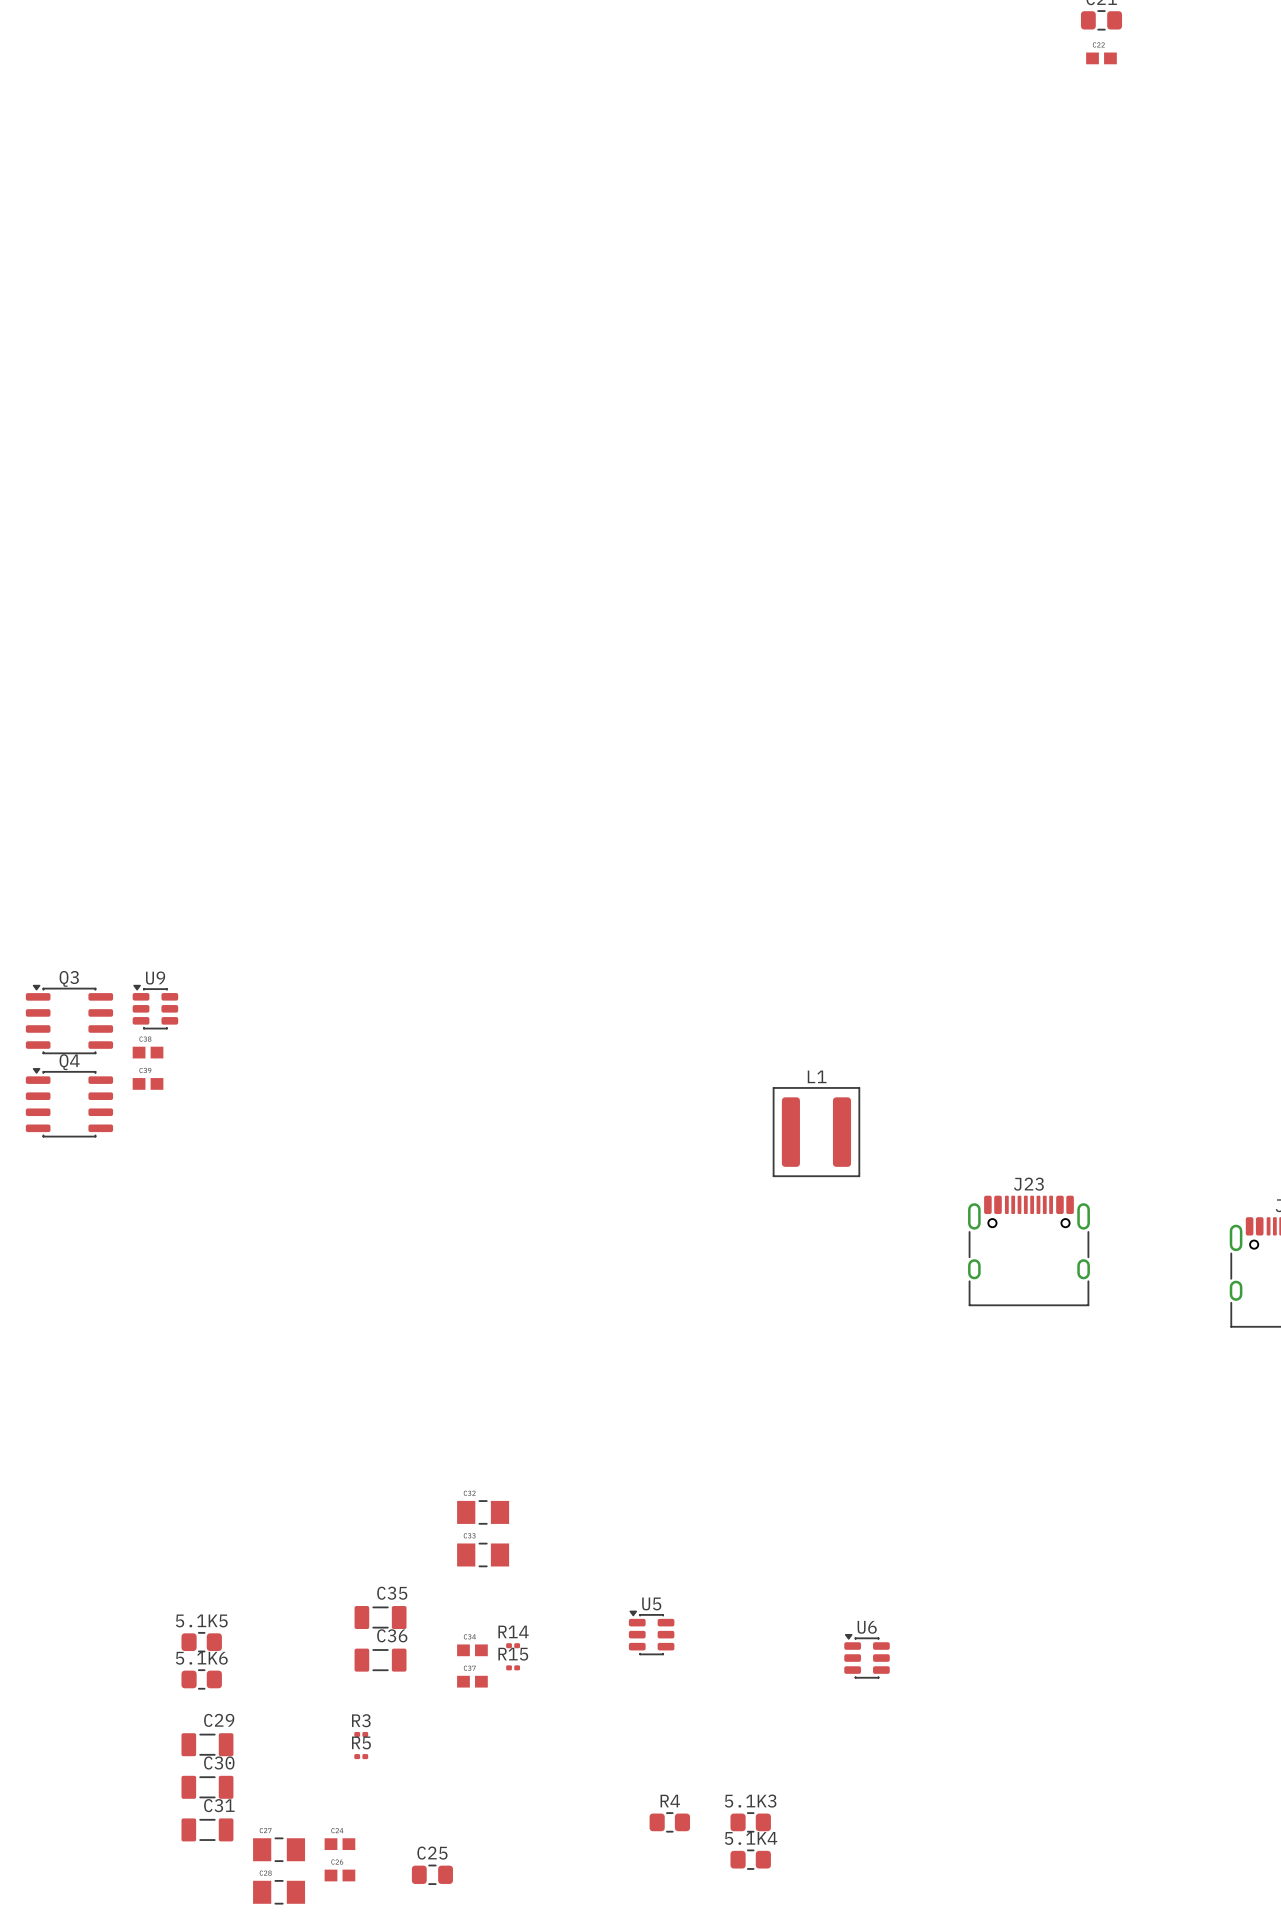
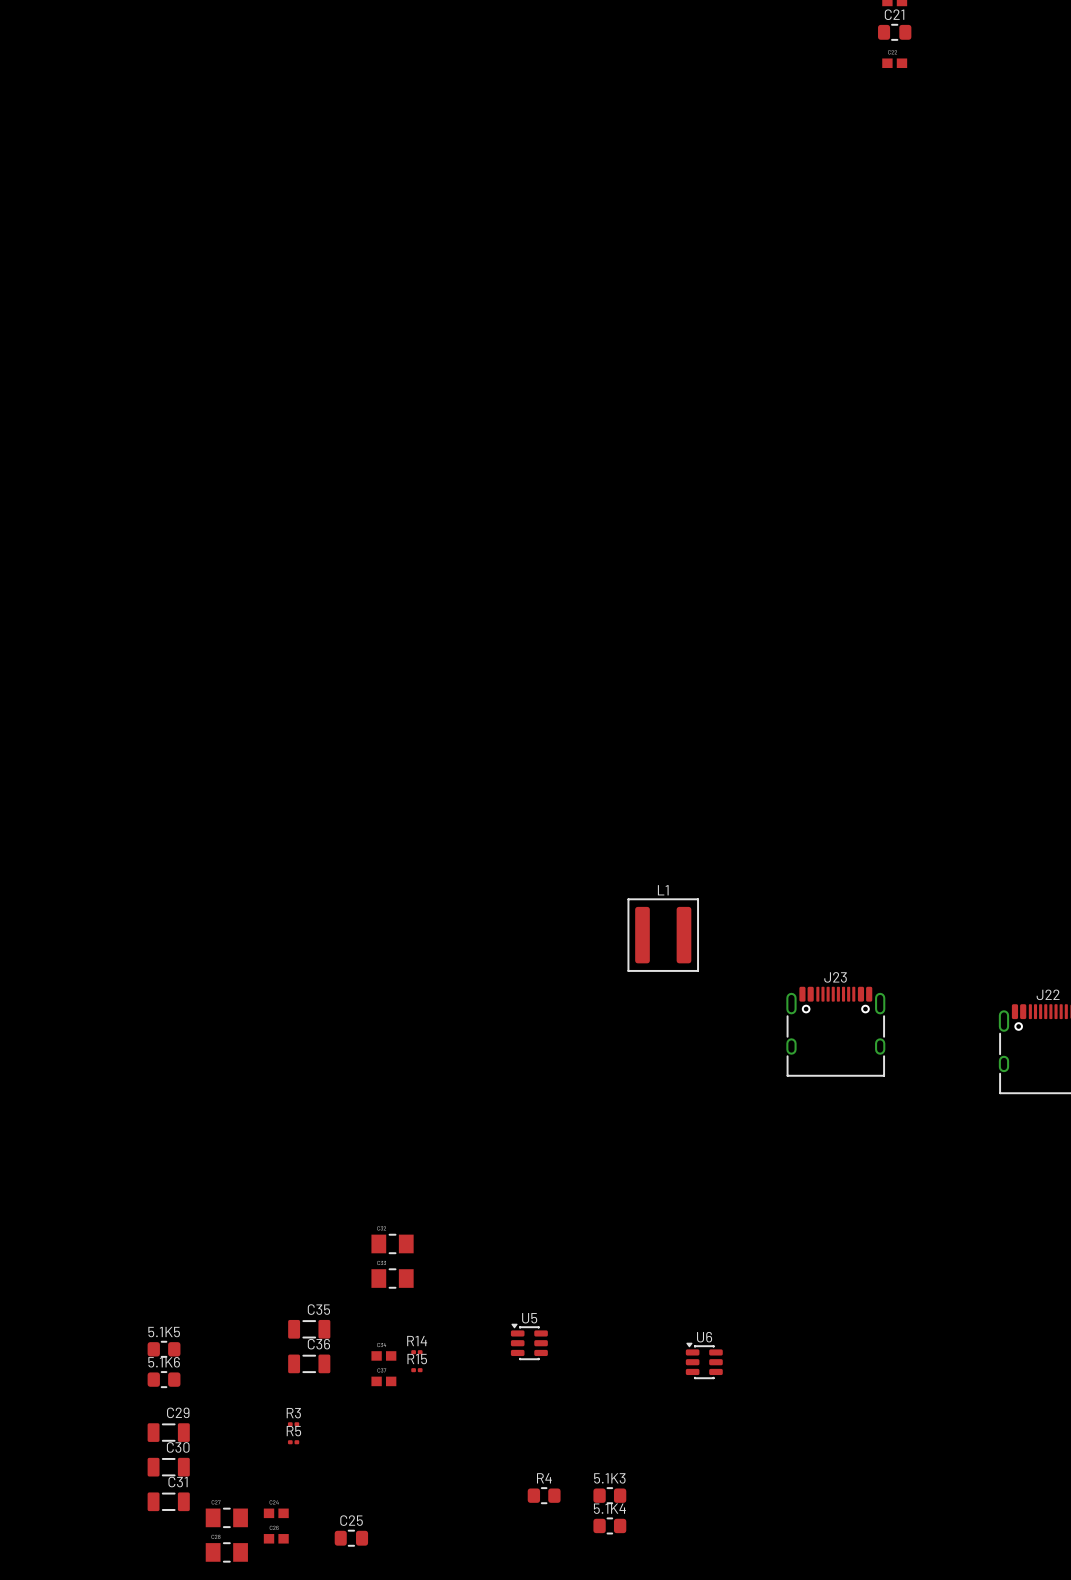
U9: (155, 1007) -> none
Q3: (69, 1019) -> none
part: (148, 1052) -> none
part: (148, 1083) -> none
Q4: (69, 1102) -> none

